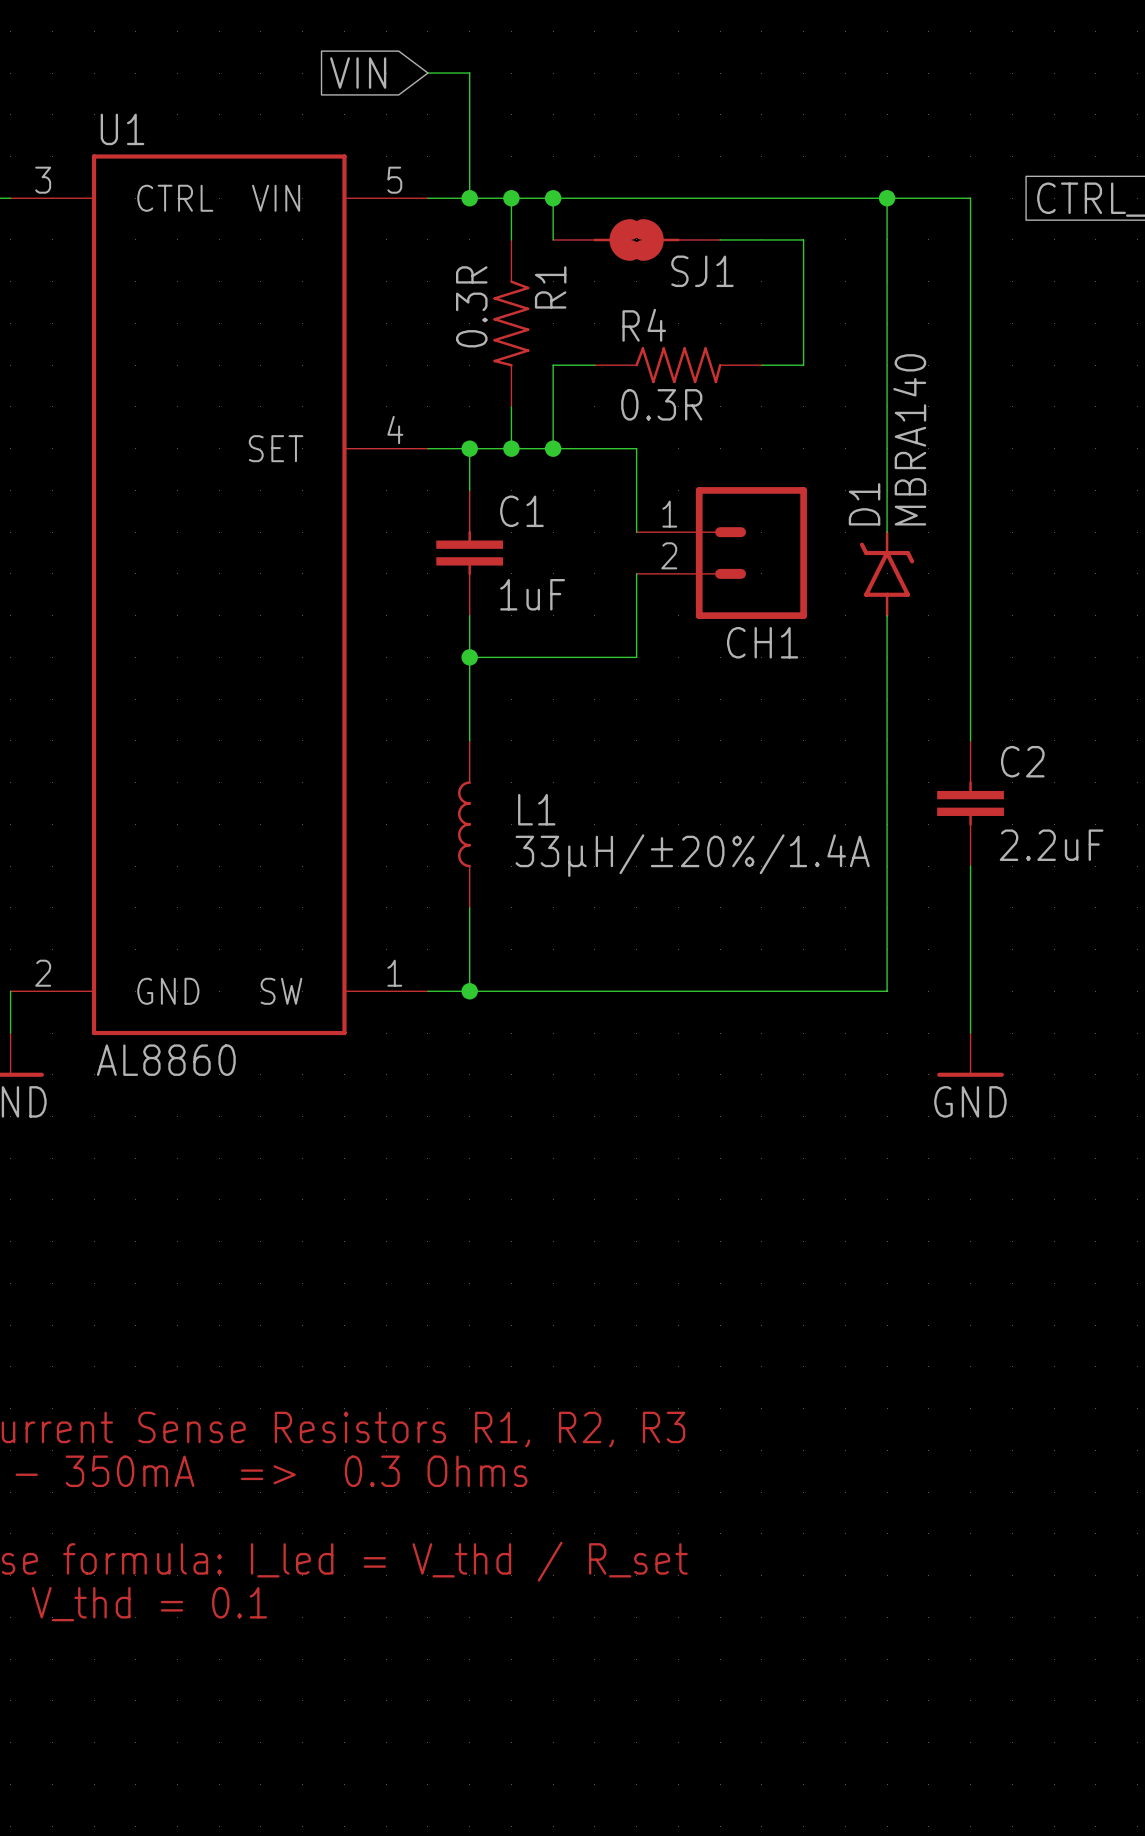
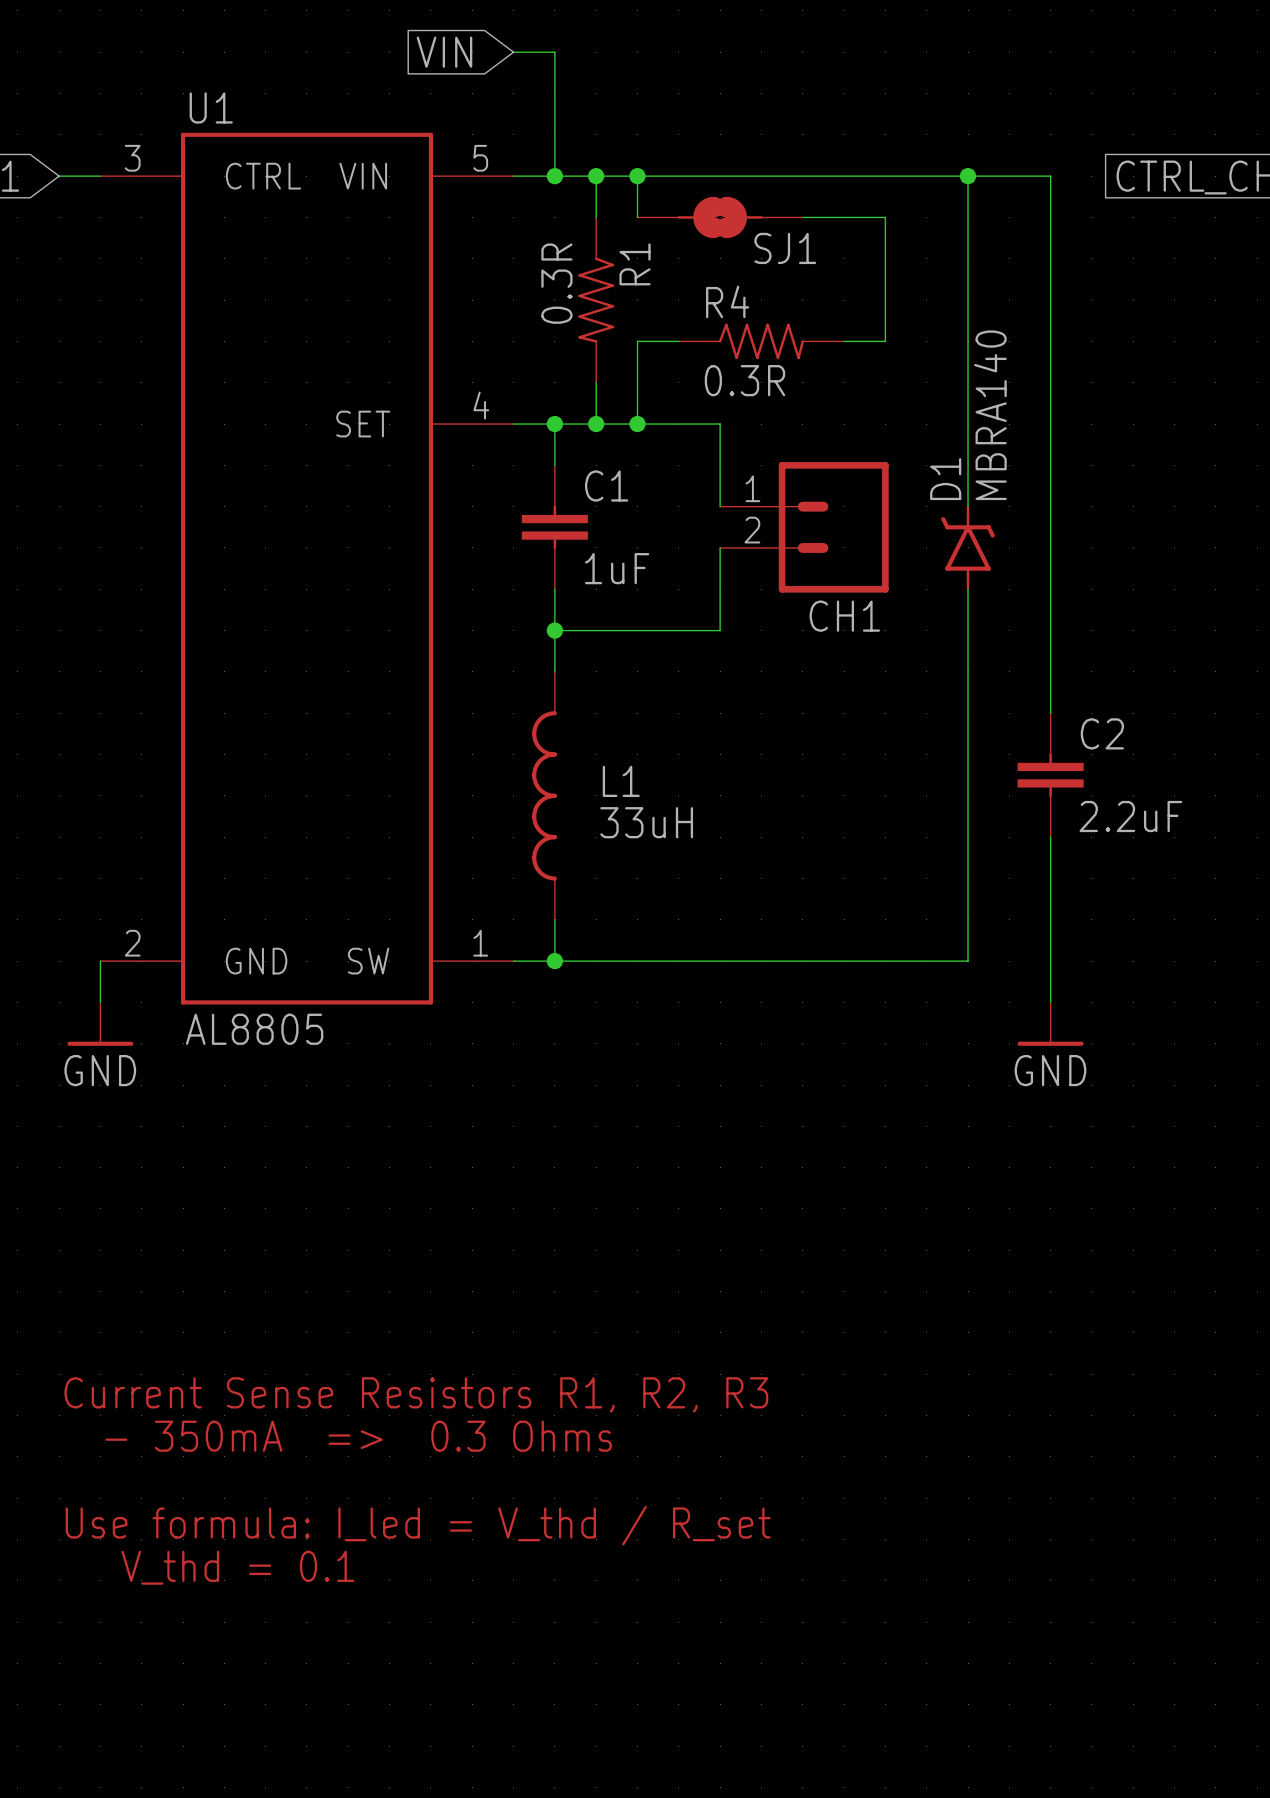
L1 symbol: [458, 740, 471, 908] -> [532, 671, 557, 920]
L1 value: 33µH/±20%/1.4A (692, 855) -> 33uH (646, 822)
U1 value: AL8860 (166, 1060) -> AL8805 (254, 1029)

